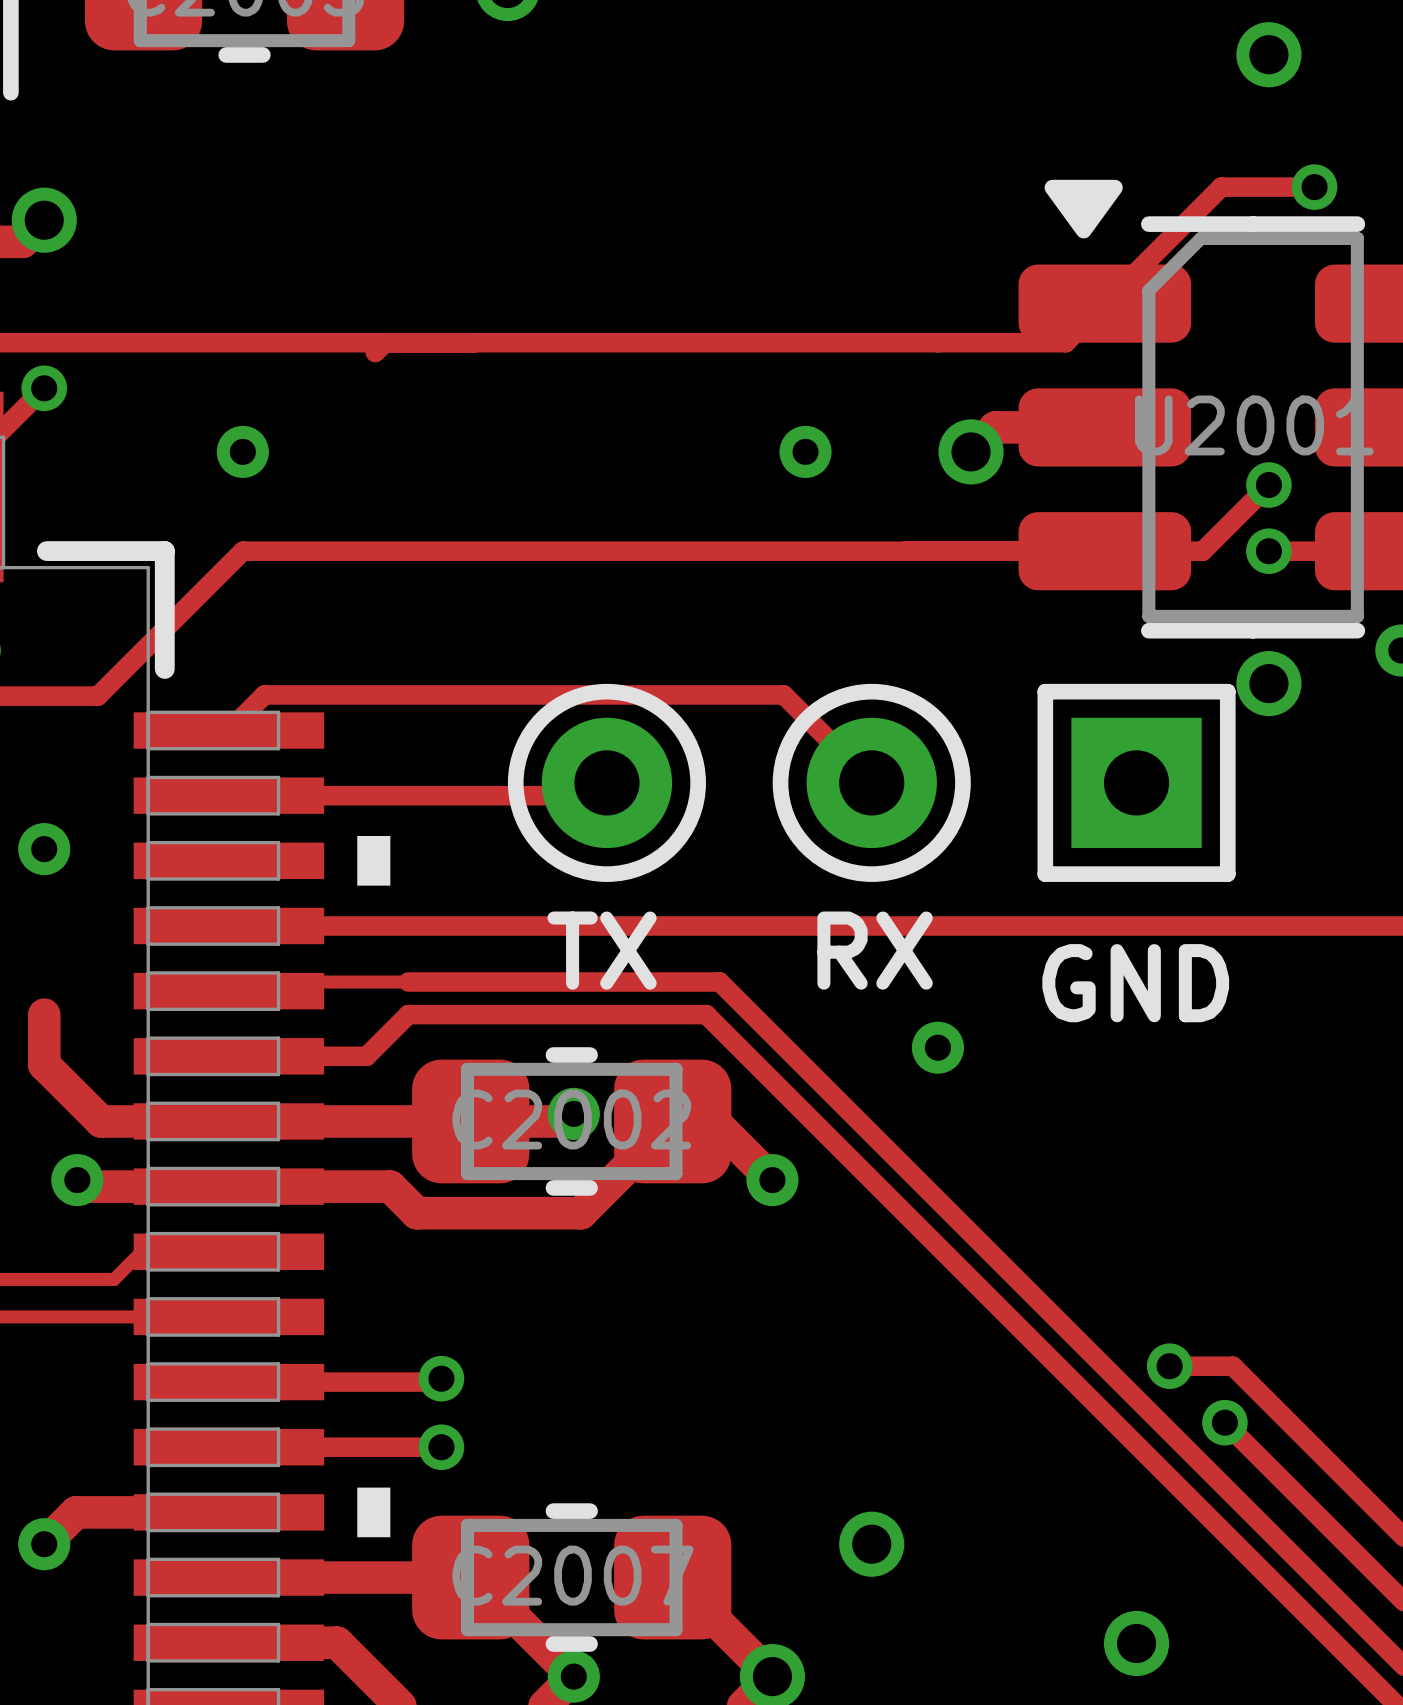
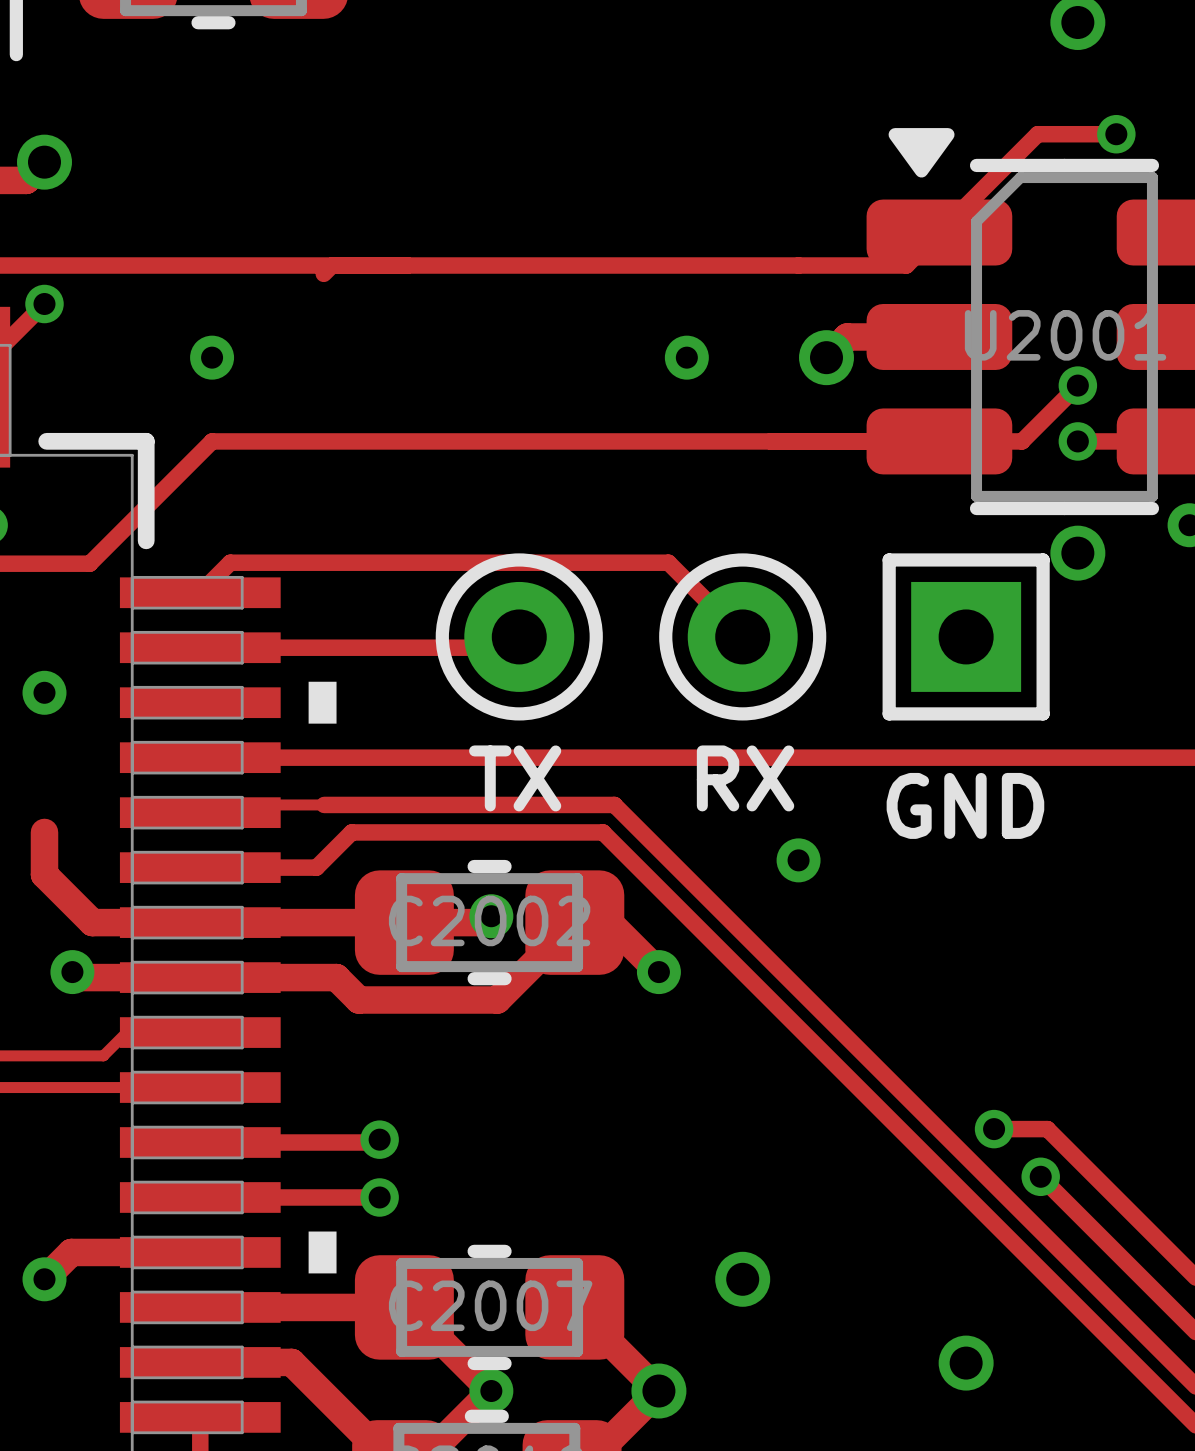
track width: thin (375, 982) (408, 982) -> thick (324, 804) (351, 804)

